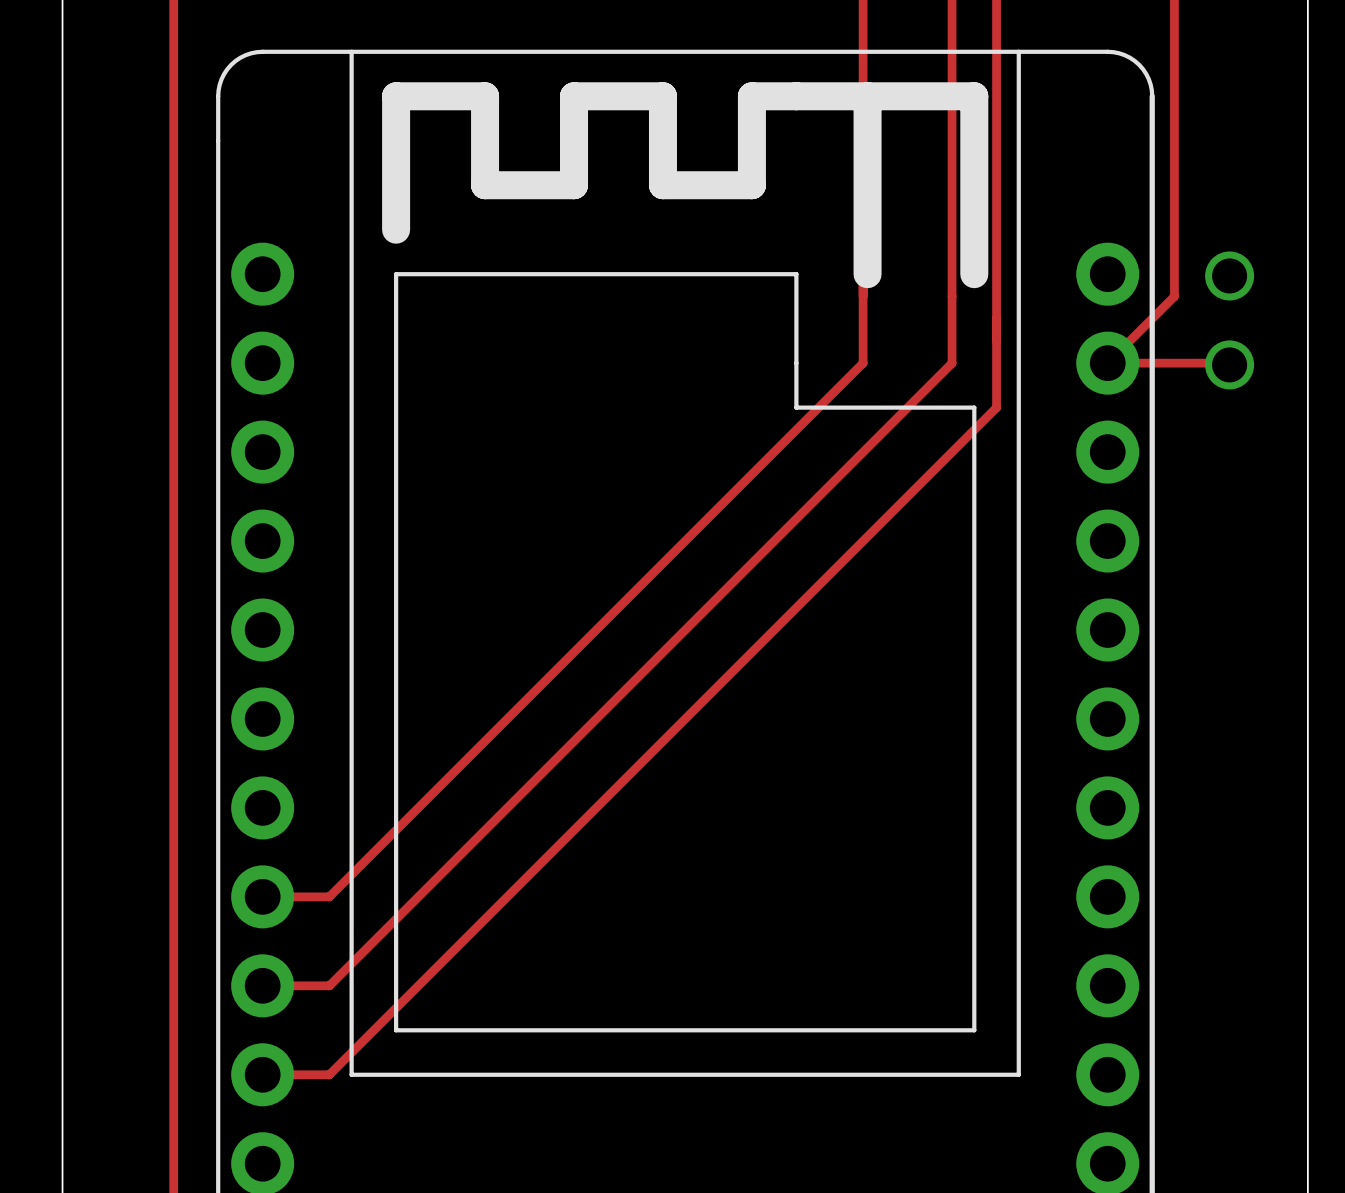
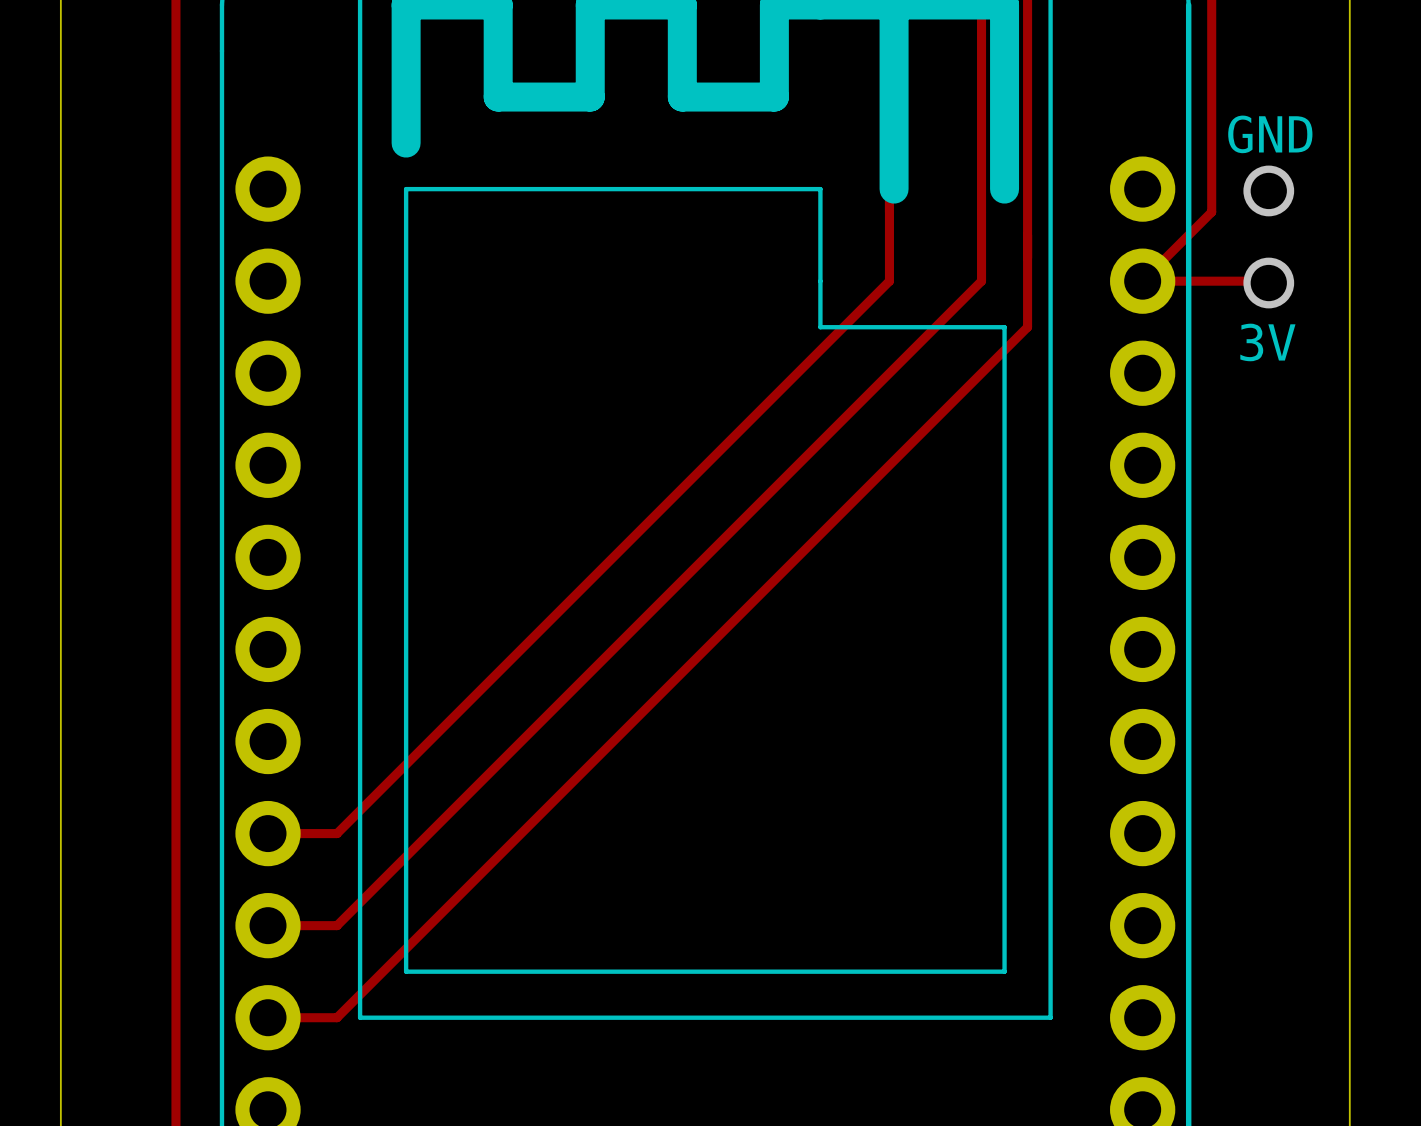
text: none -> GND (1270, 134)
text: none -> 3V (1267, 342)

